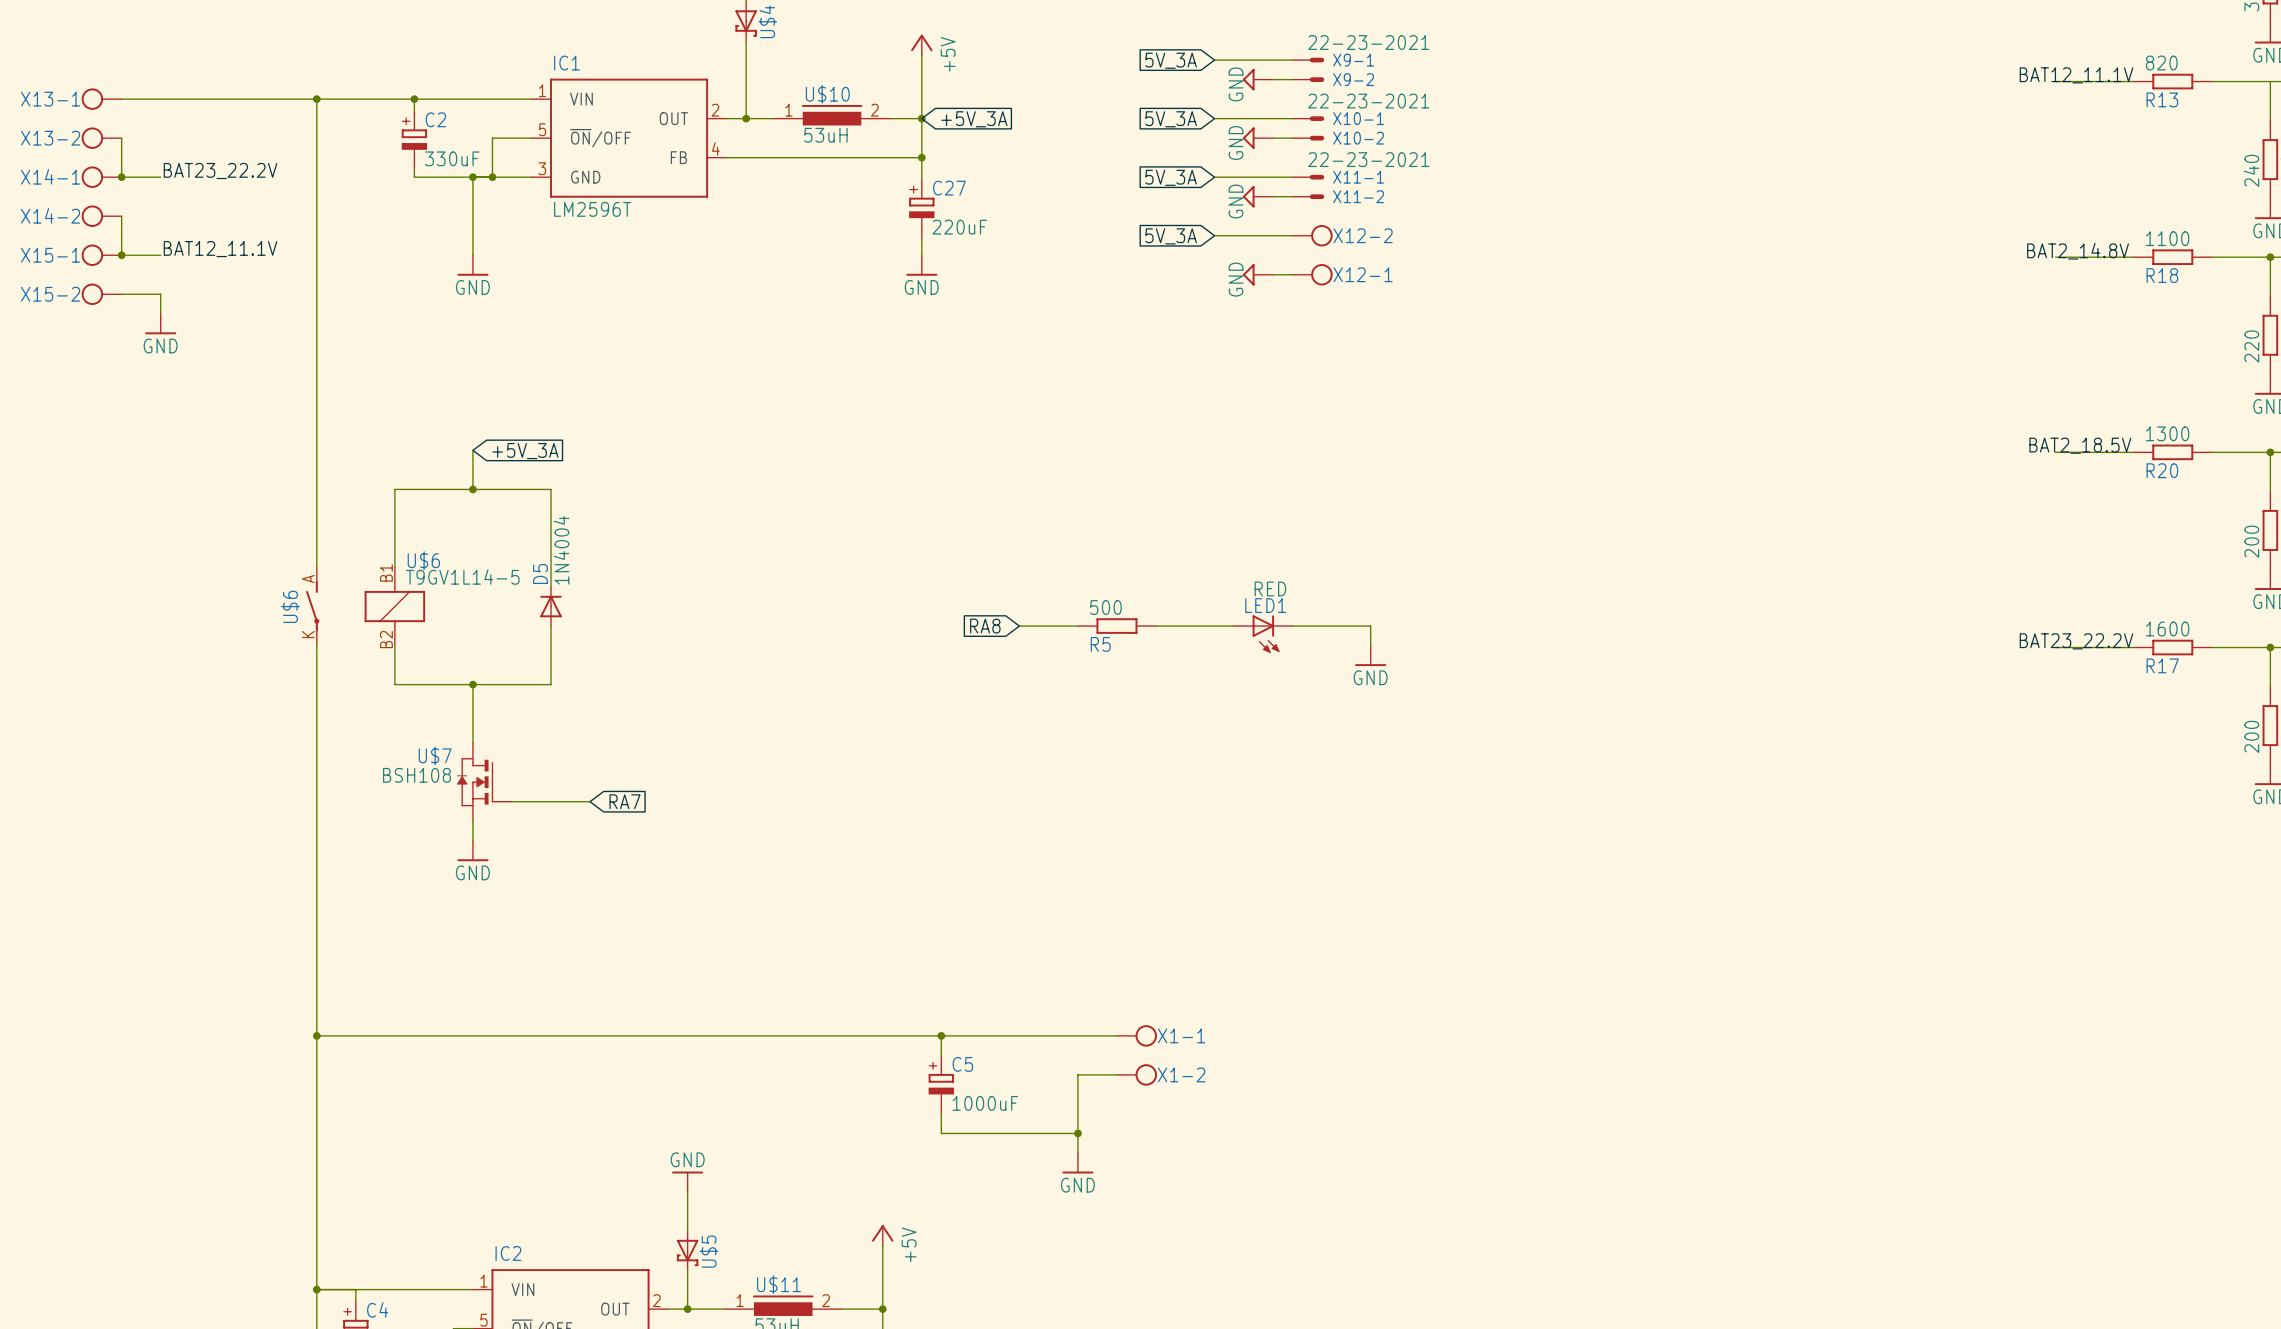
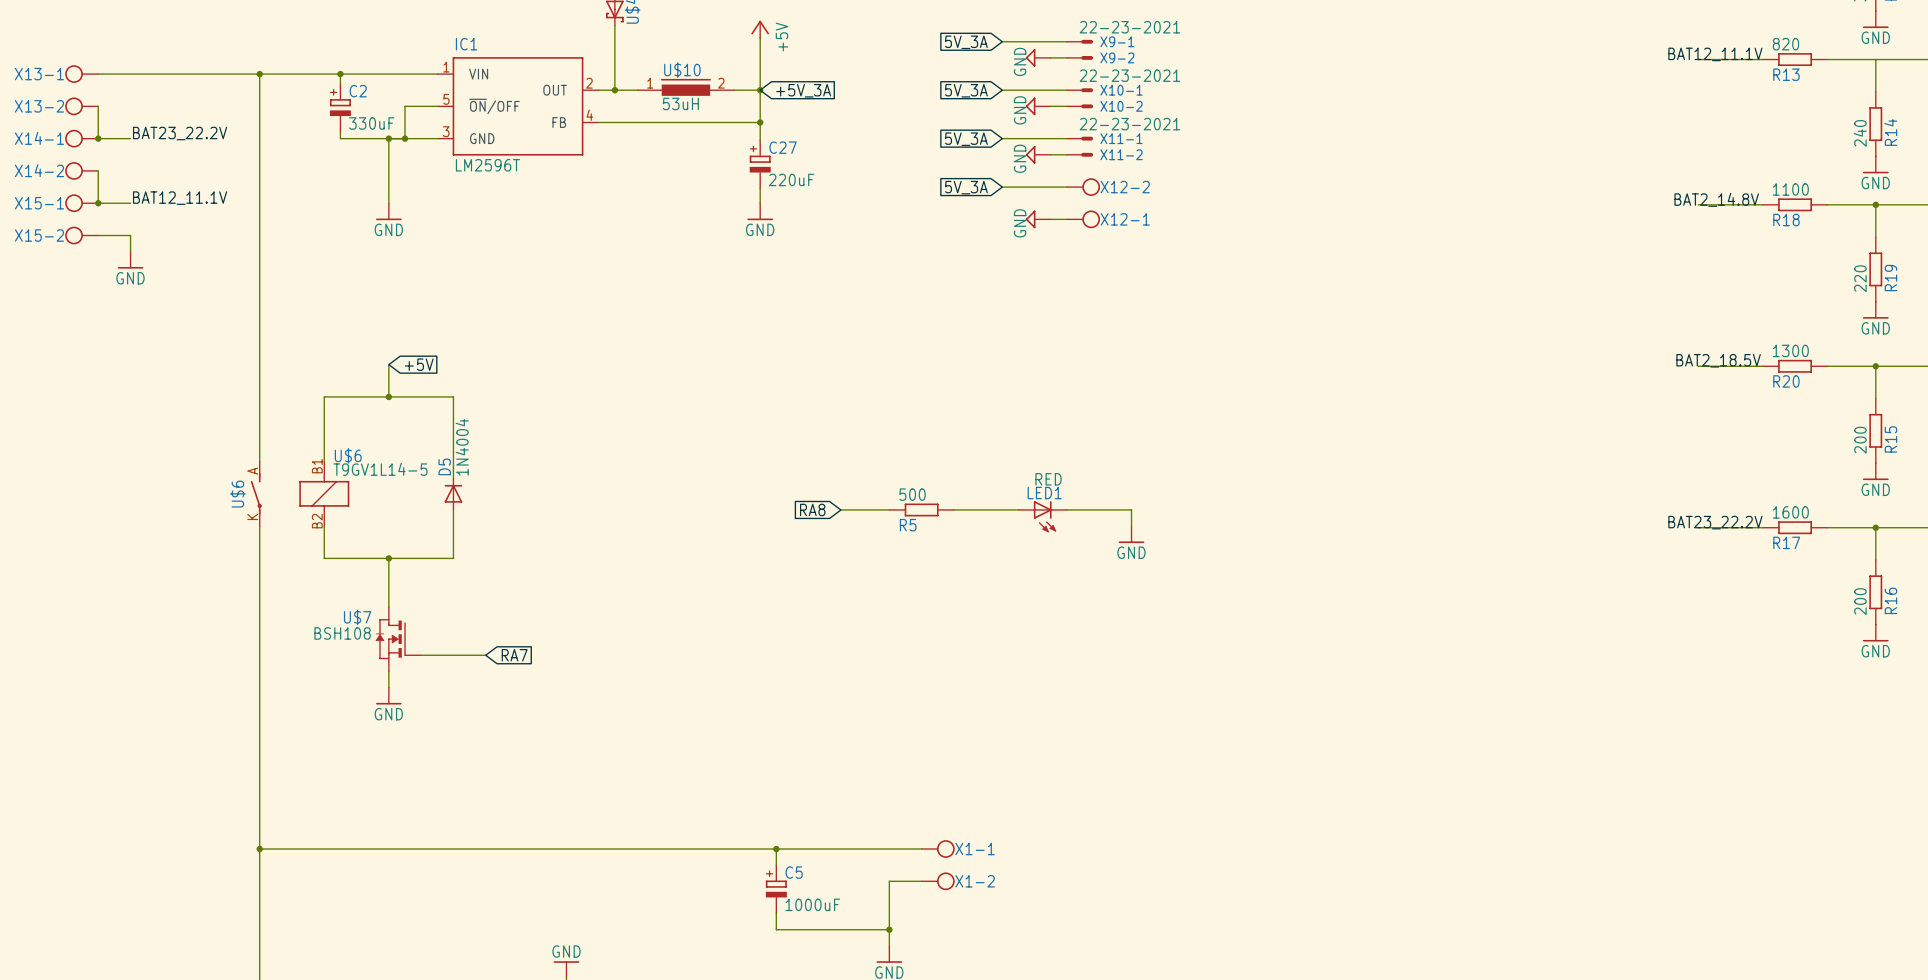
global label: +5V_3A (525, 451) -> +5V (419, 364)

